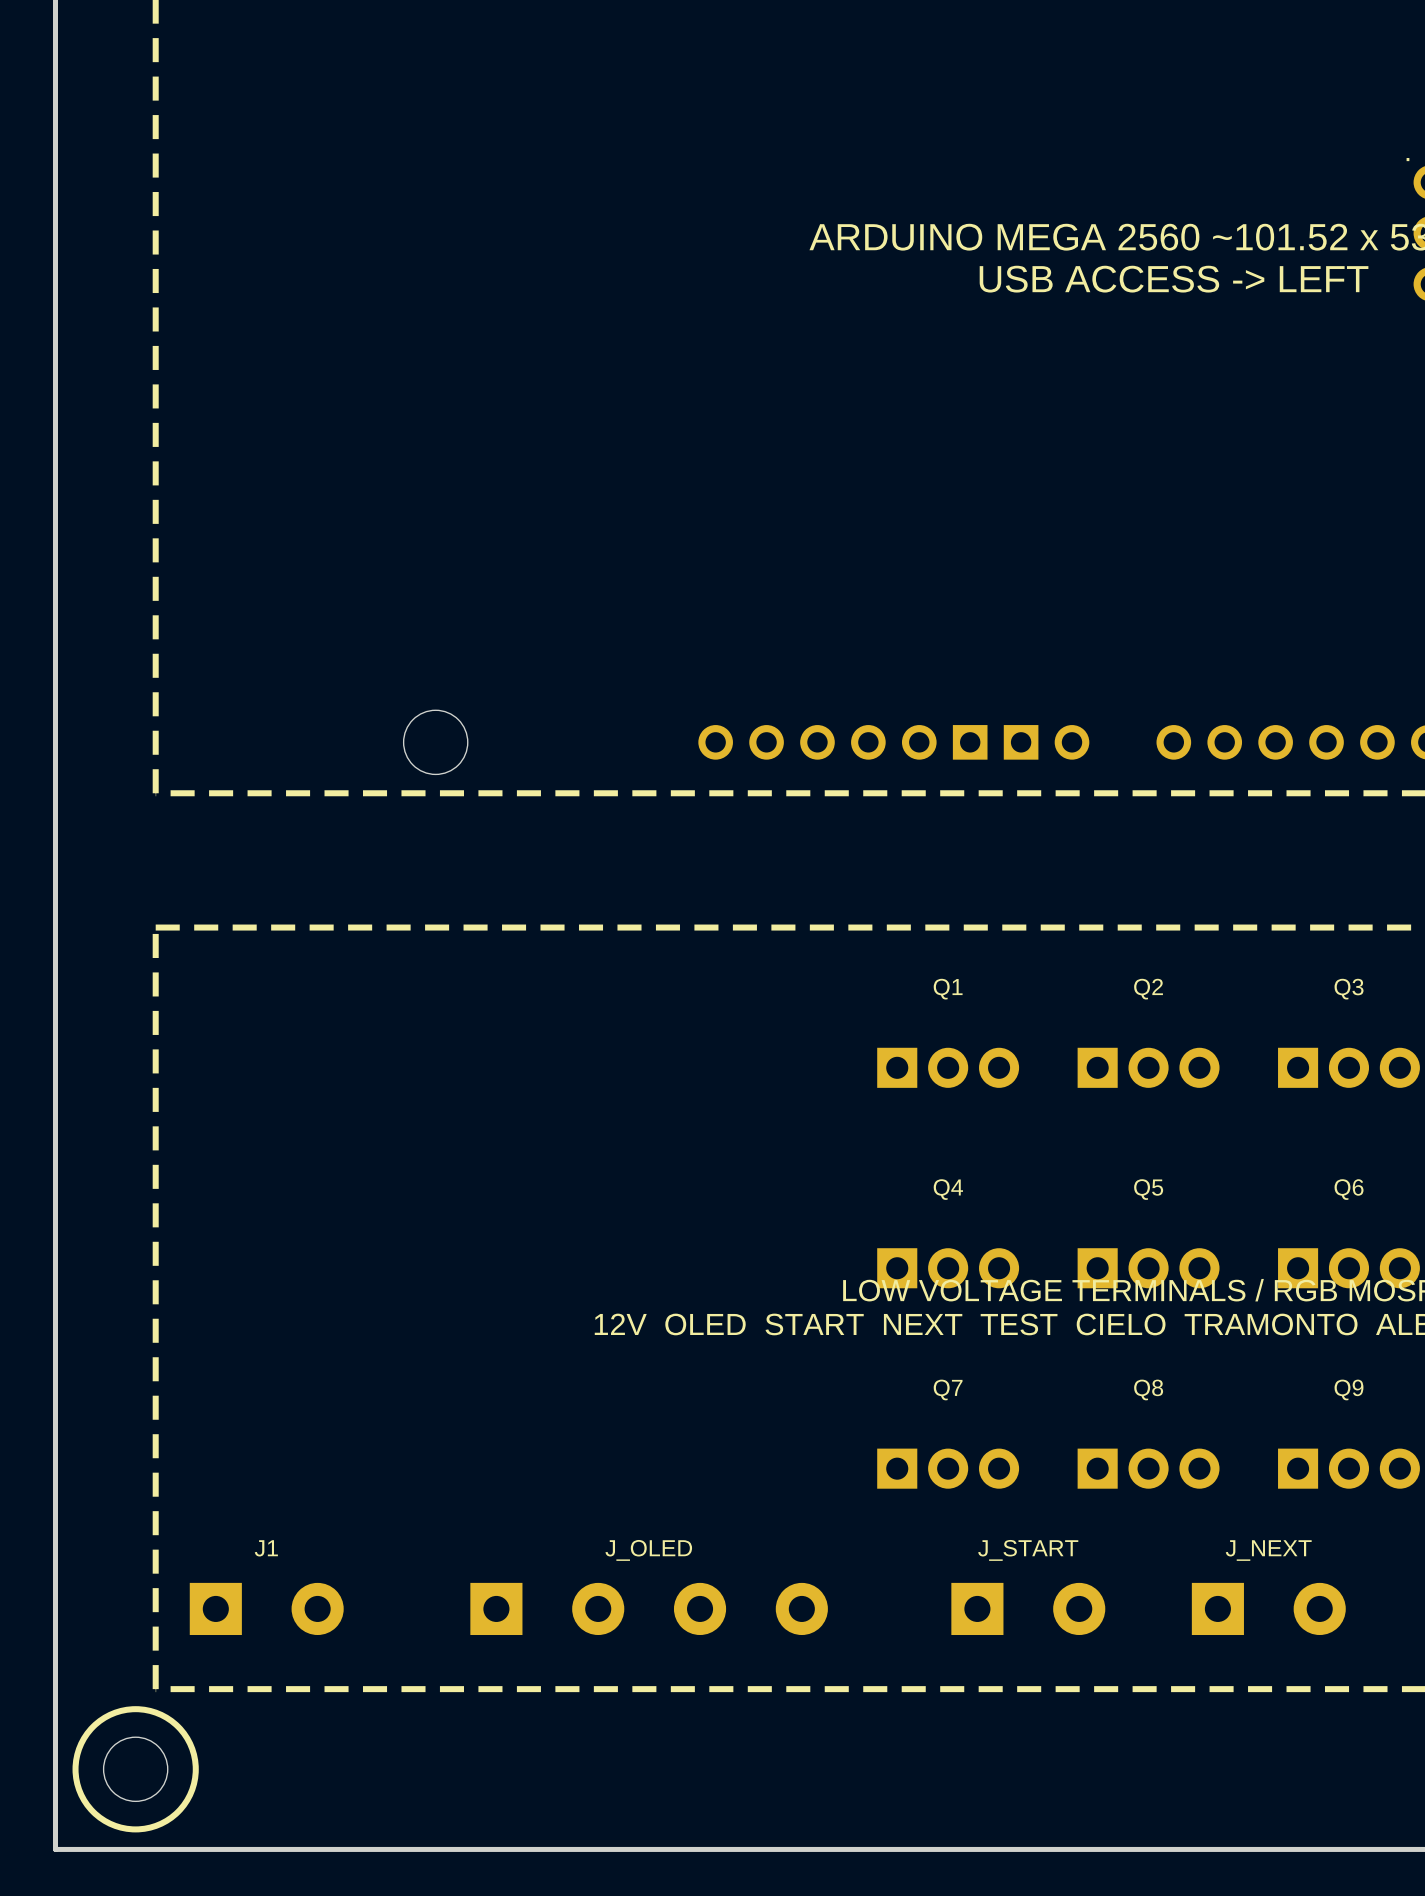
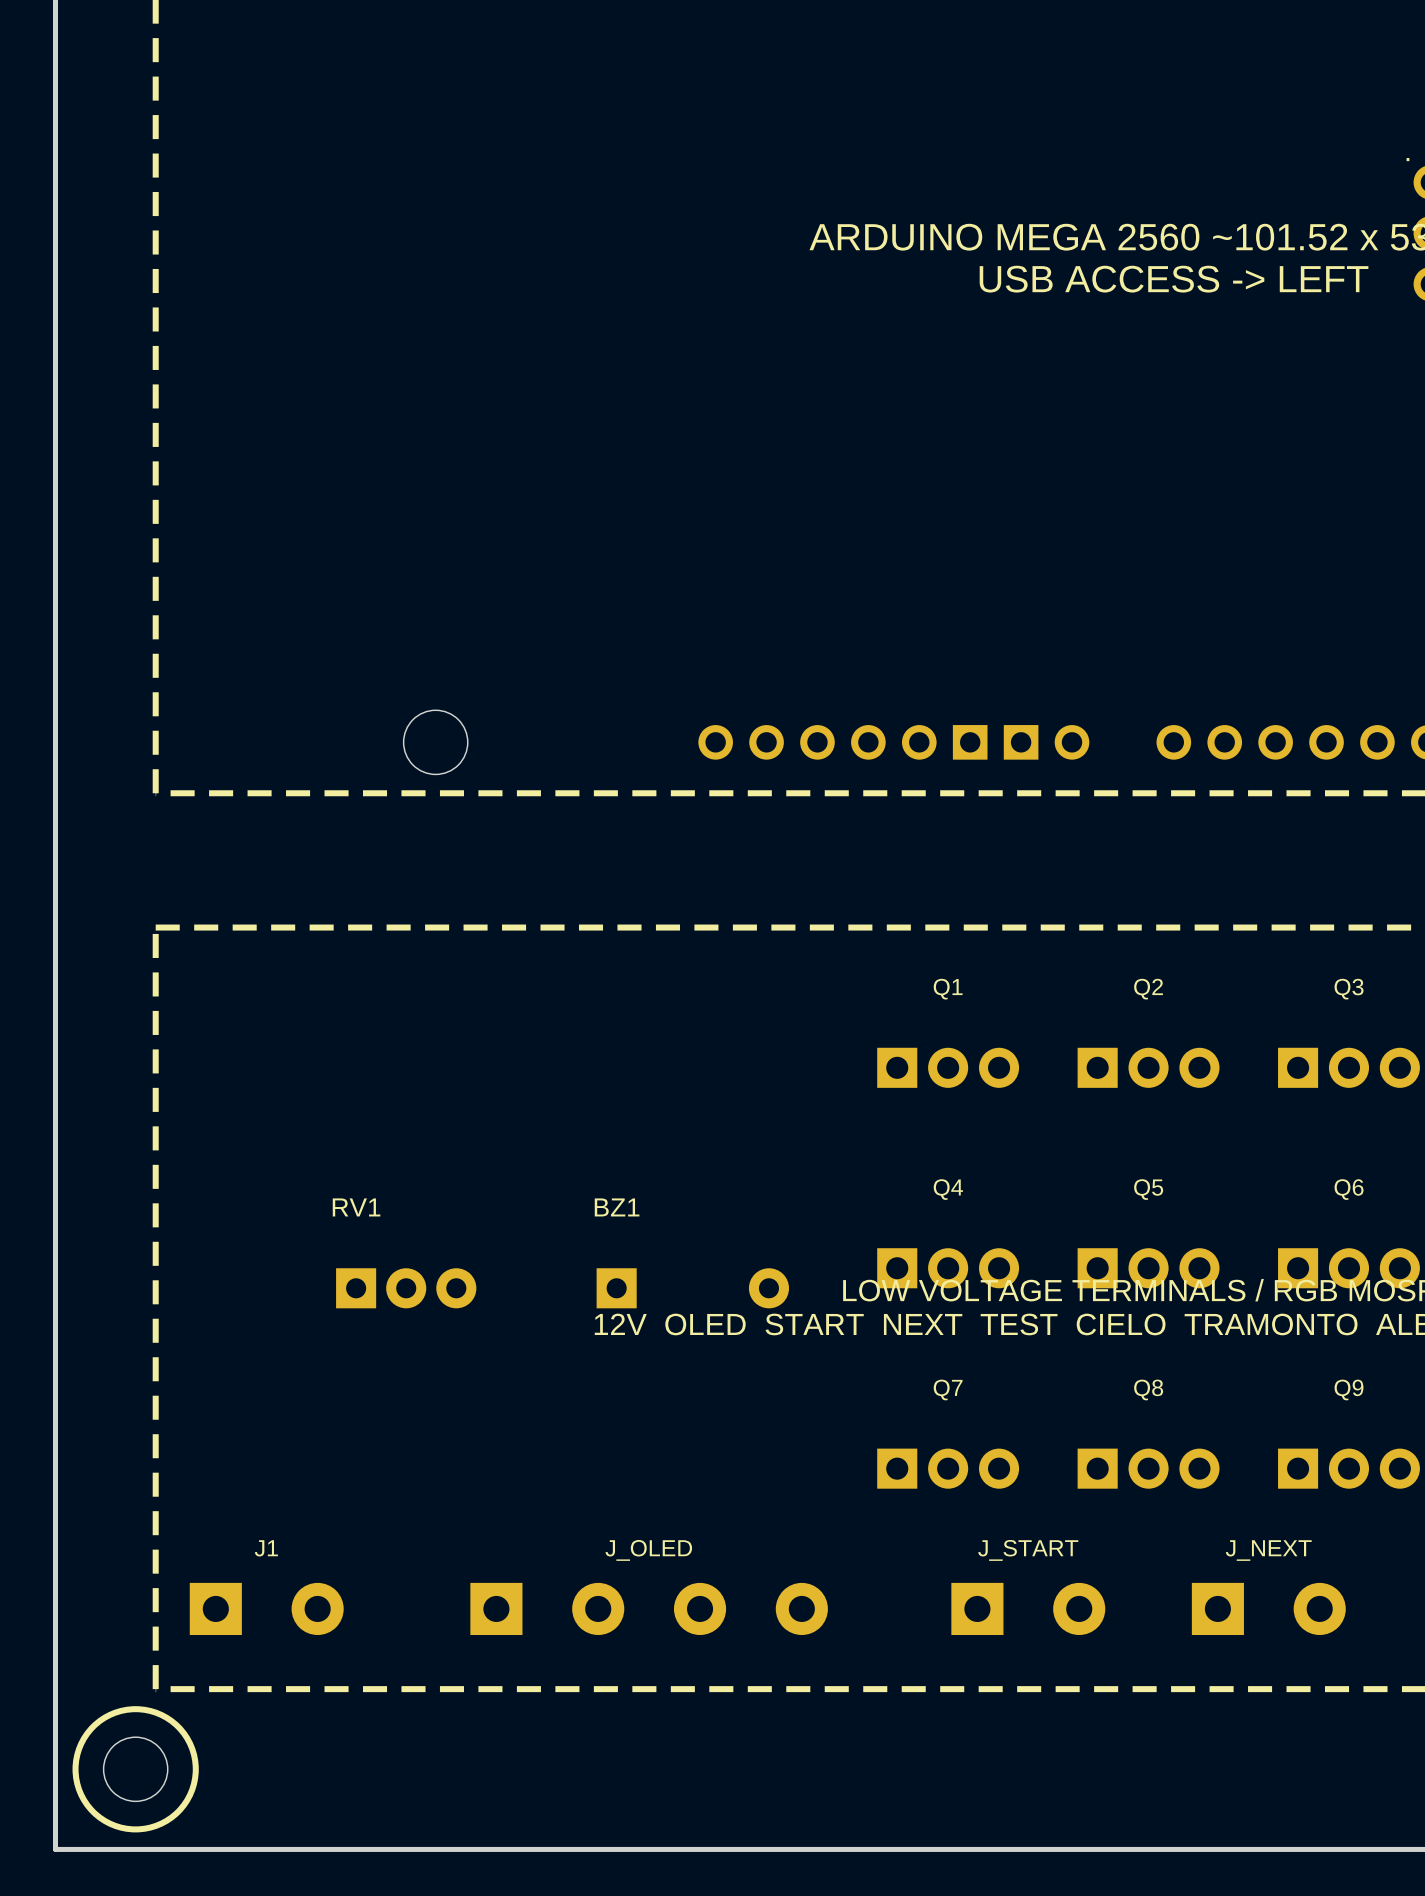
RV1: none -> (406, 1288)
BZ1: none -> (692, 1288)

